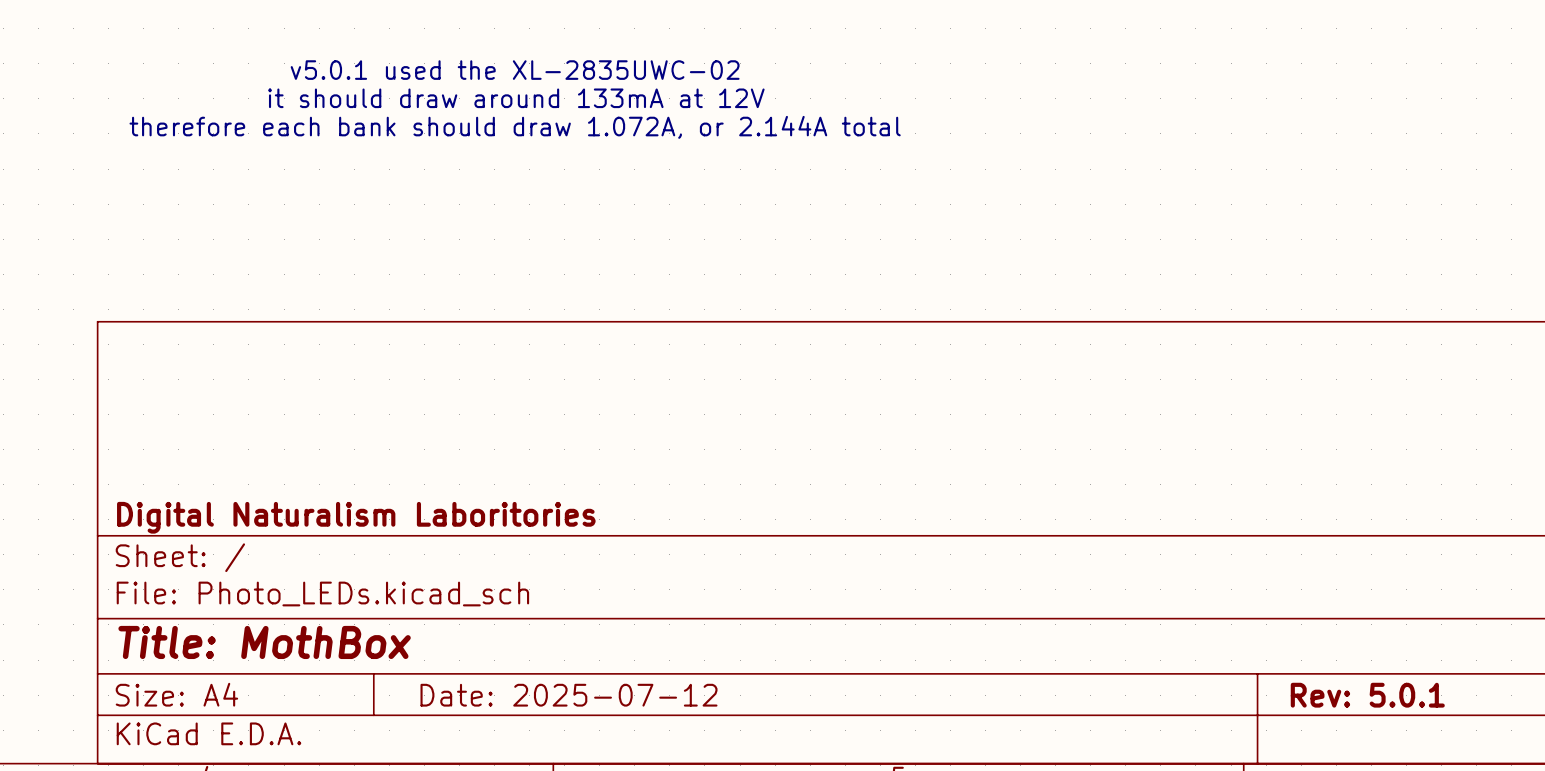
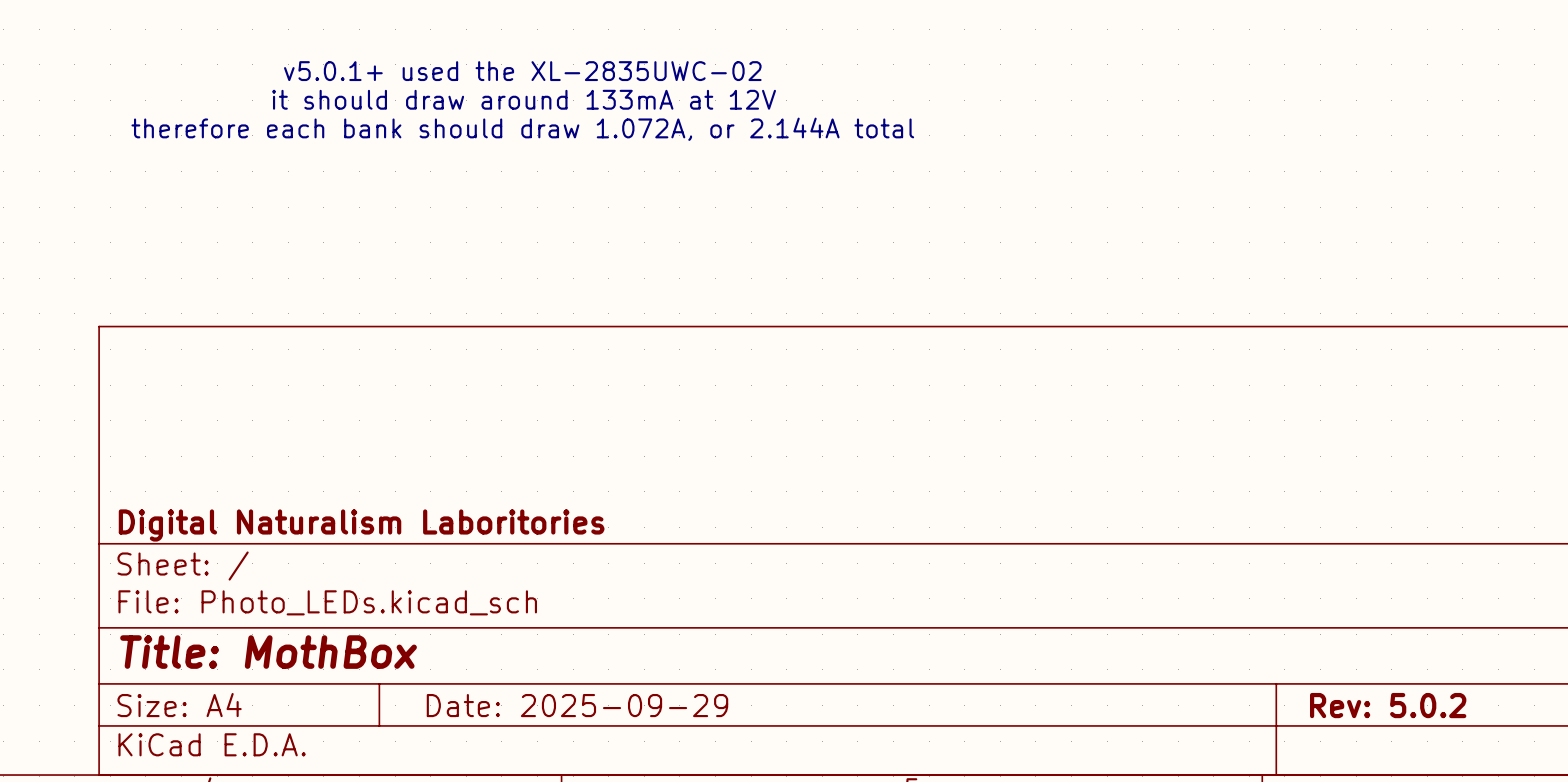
text: v5.0.1 used the XL-2835UWC-02 (515, 70) -> v5.0.1+ used the XL-2835UWC-02 (522, 71)
title block: Date: 2025-07-12 (569, 695) -> Date: 2025-09-29 (577, 705)
title block: Rev: 5.0.1 (1367, 695) -> Rev: 5.0.2 (1388, 705)

